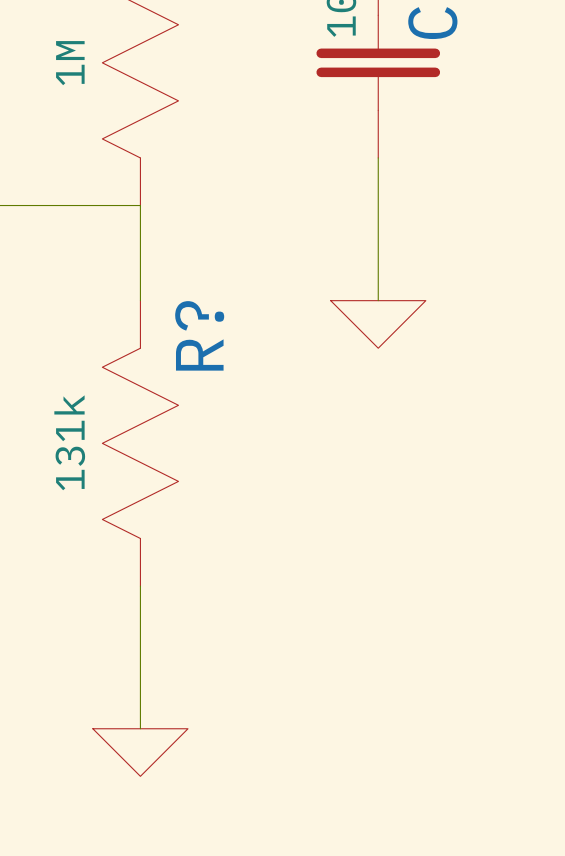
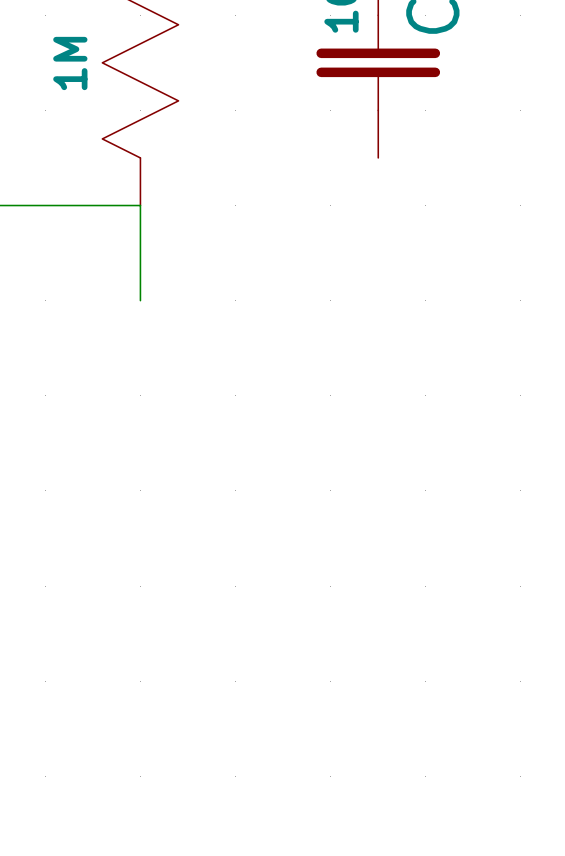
wire: (378, 157) (378, 300) -> none
power symbol: (378, 324) -> none
R?: 131k (140, 443) -> none
wire: (140, 586) (140, 728) -> none
power symbol: (140, 752) -> none

